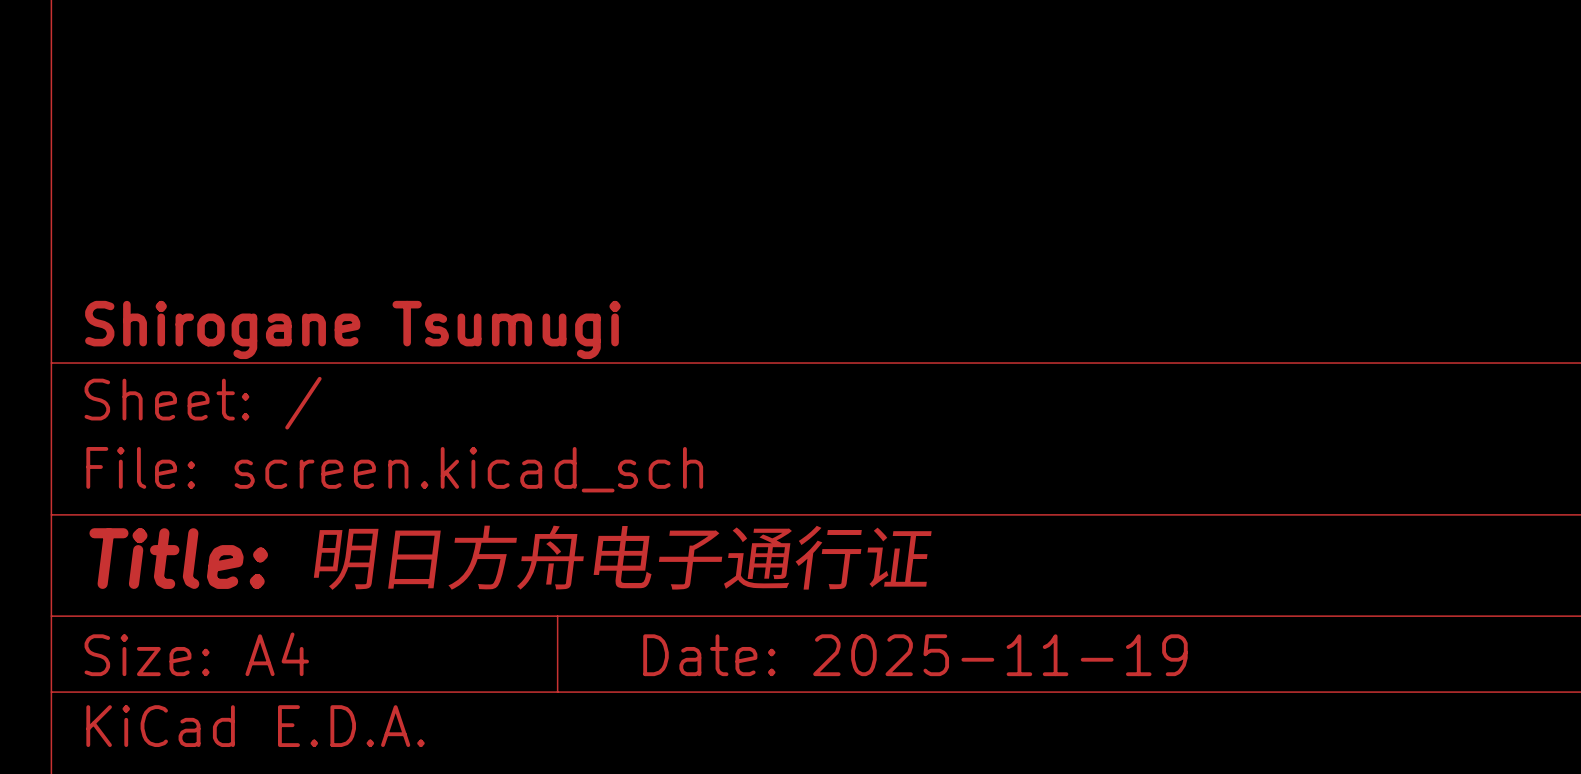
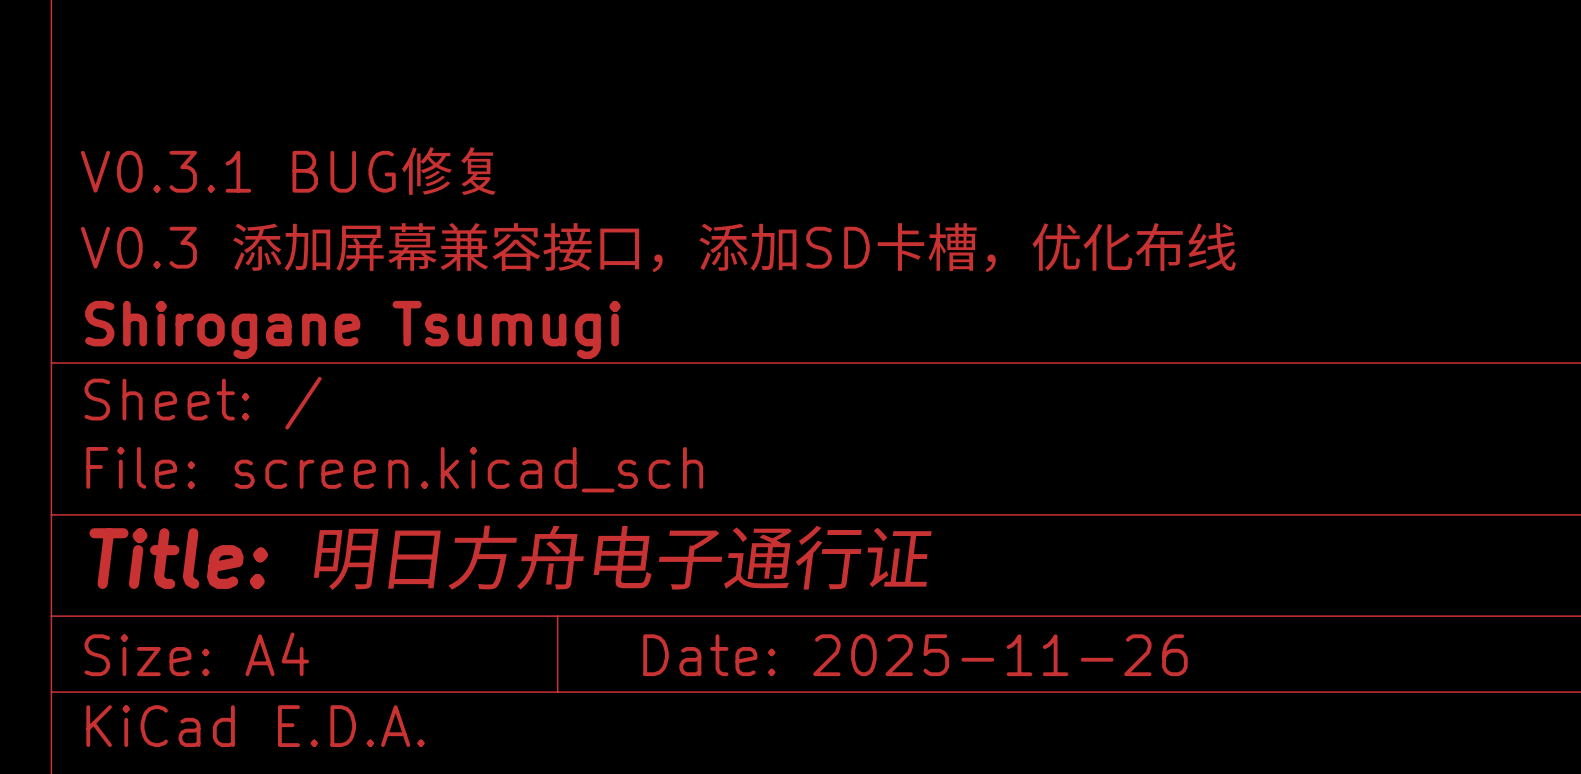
title block: none -> V0.3.1 BUG修复 (289, 171)
title block: none -> V0.3 添加屏幕兼容接口，添加SD卡槽，优化布线 (659, 247)
title block: Date: 2025-11-19 (915, 655) -> Date: 2025-11-26 (915, 655)

